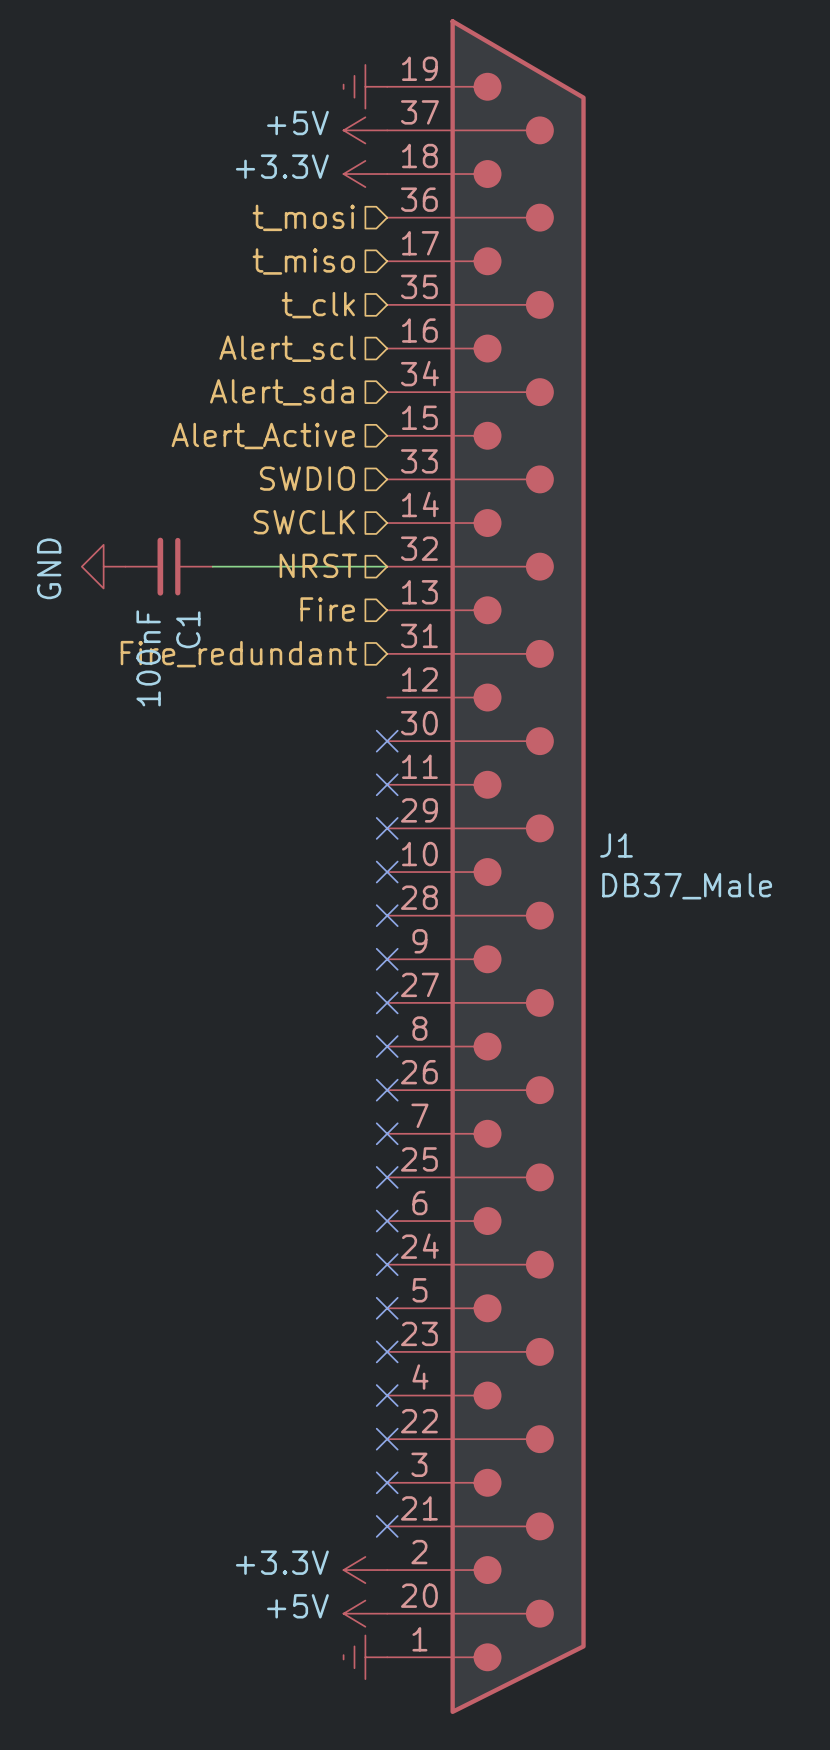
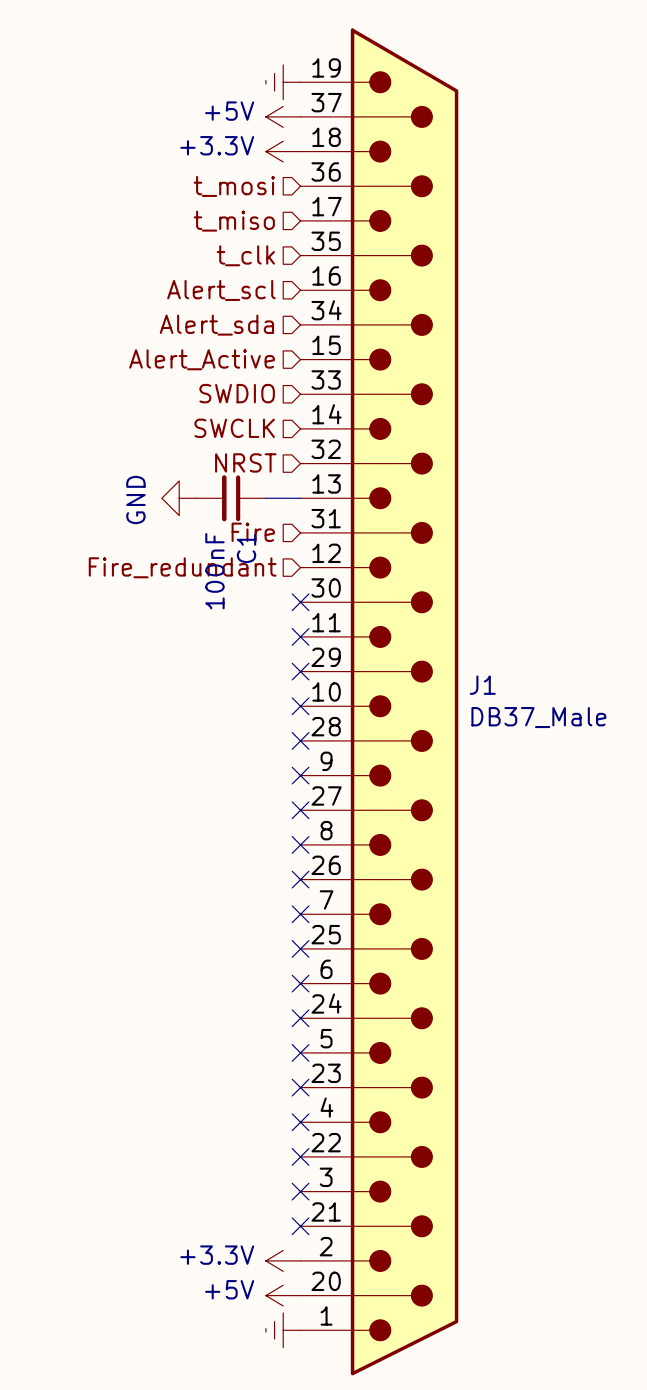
power symbol position: GND (103, 566) -> GND (179, 498)
C1 position: (169, 566) -> (231, 498)
wire: (212, 566) (387, 566) -> none
hierarchical label: Fire (327, 609) -> none
wire: none -> (265, 498) (300, 498)
hierarchical label: Fire_redundant (238, 654) -> Fire (253, 532)
hierarchical label: none -> Fire_redundant (182, 567)

